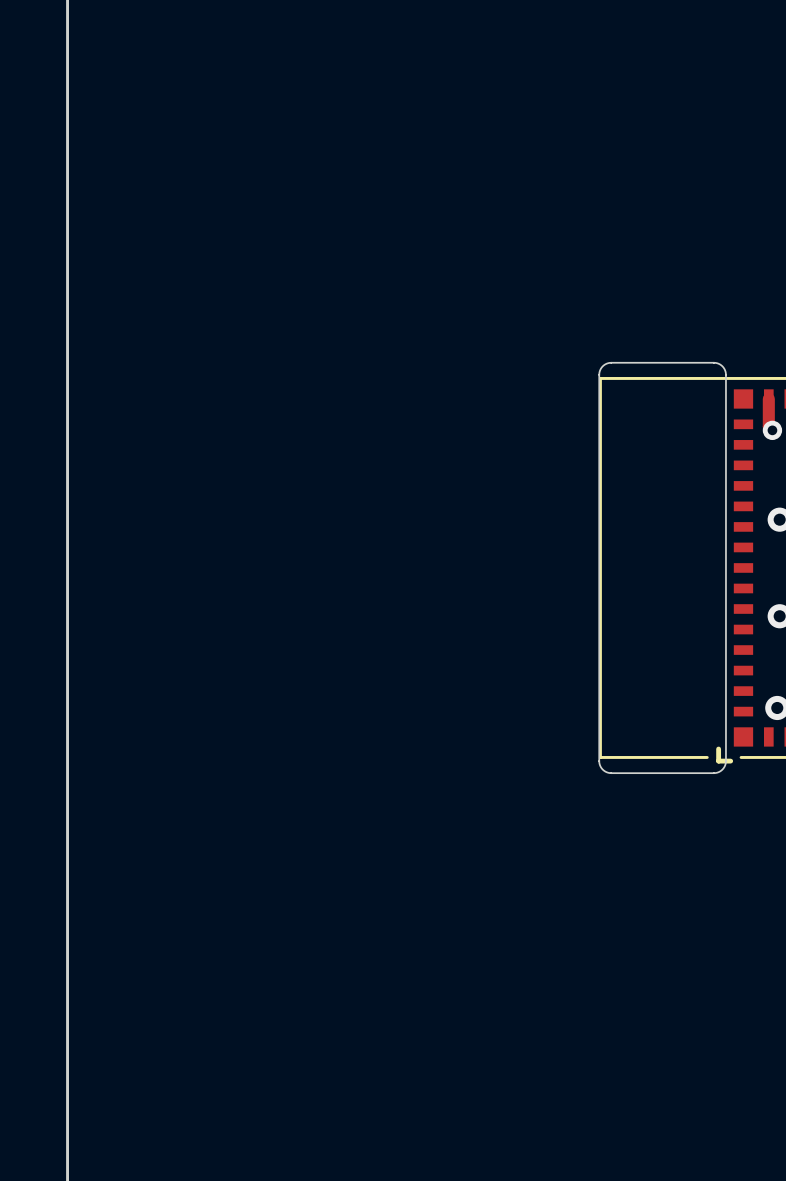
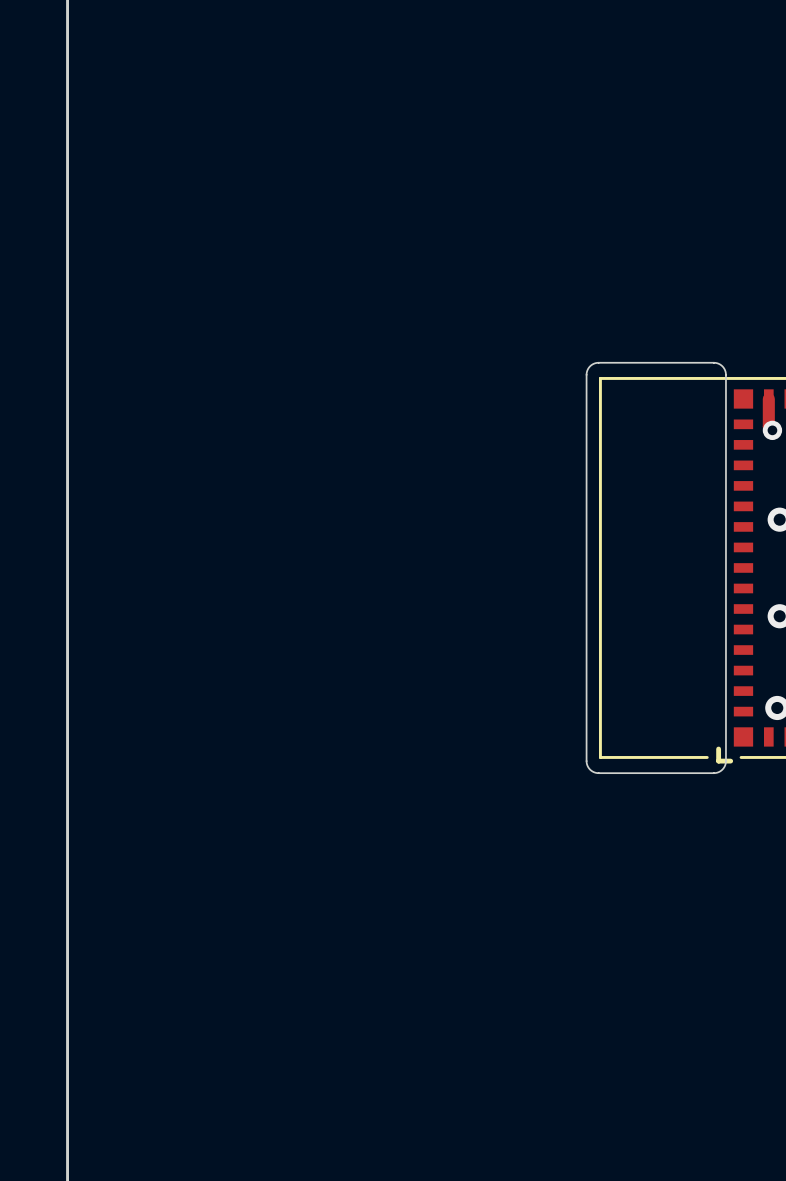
board edge: (611, 362) (602, 366) (599, 374) (599, 761) (602, 769) (611, 773) -> (611, 362) (594, 363) (589, 367) (586, 374) (586, 761) (588, 767) (594, 772) (611, 773)

